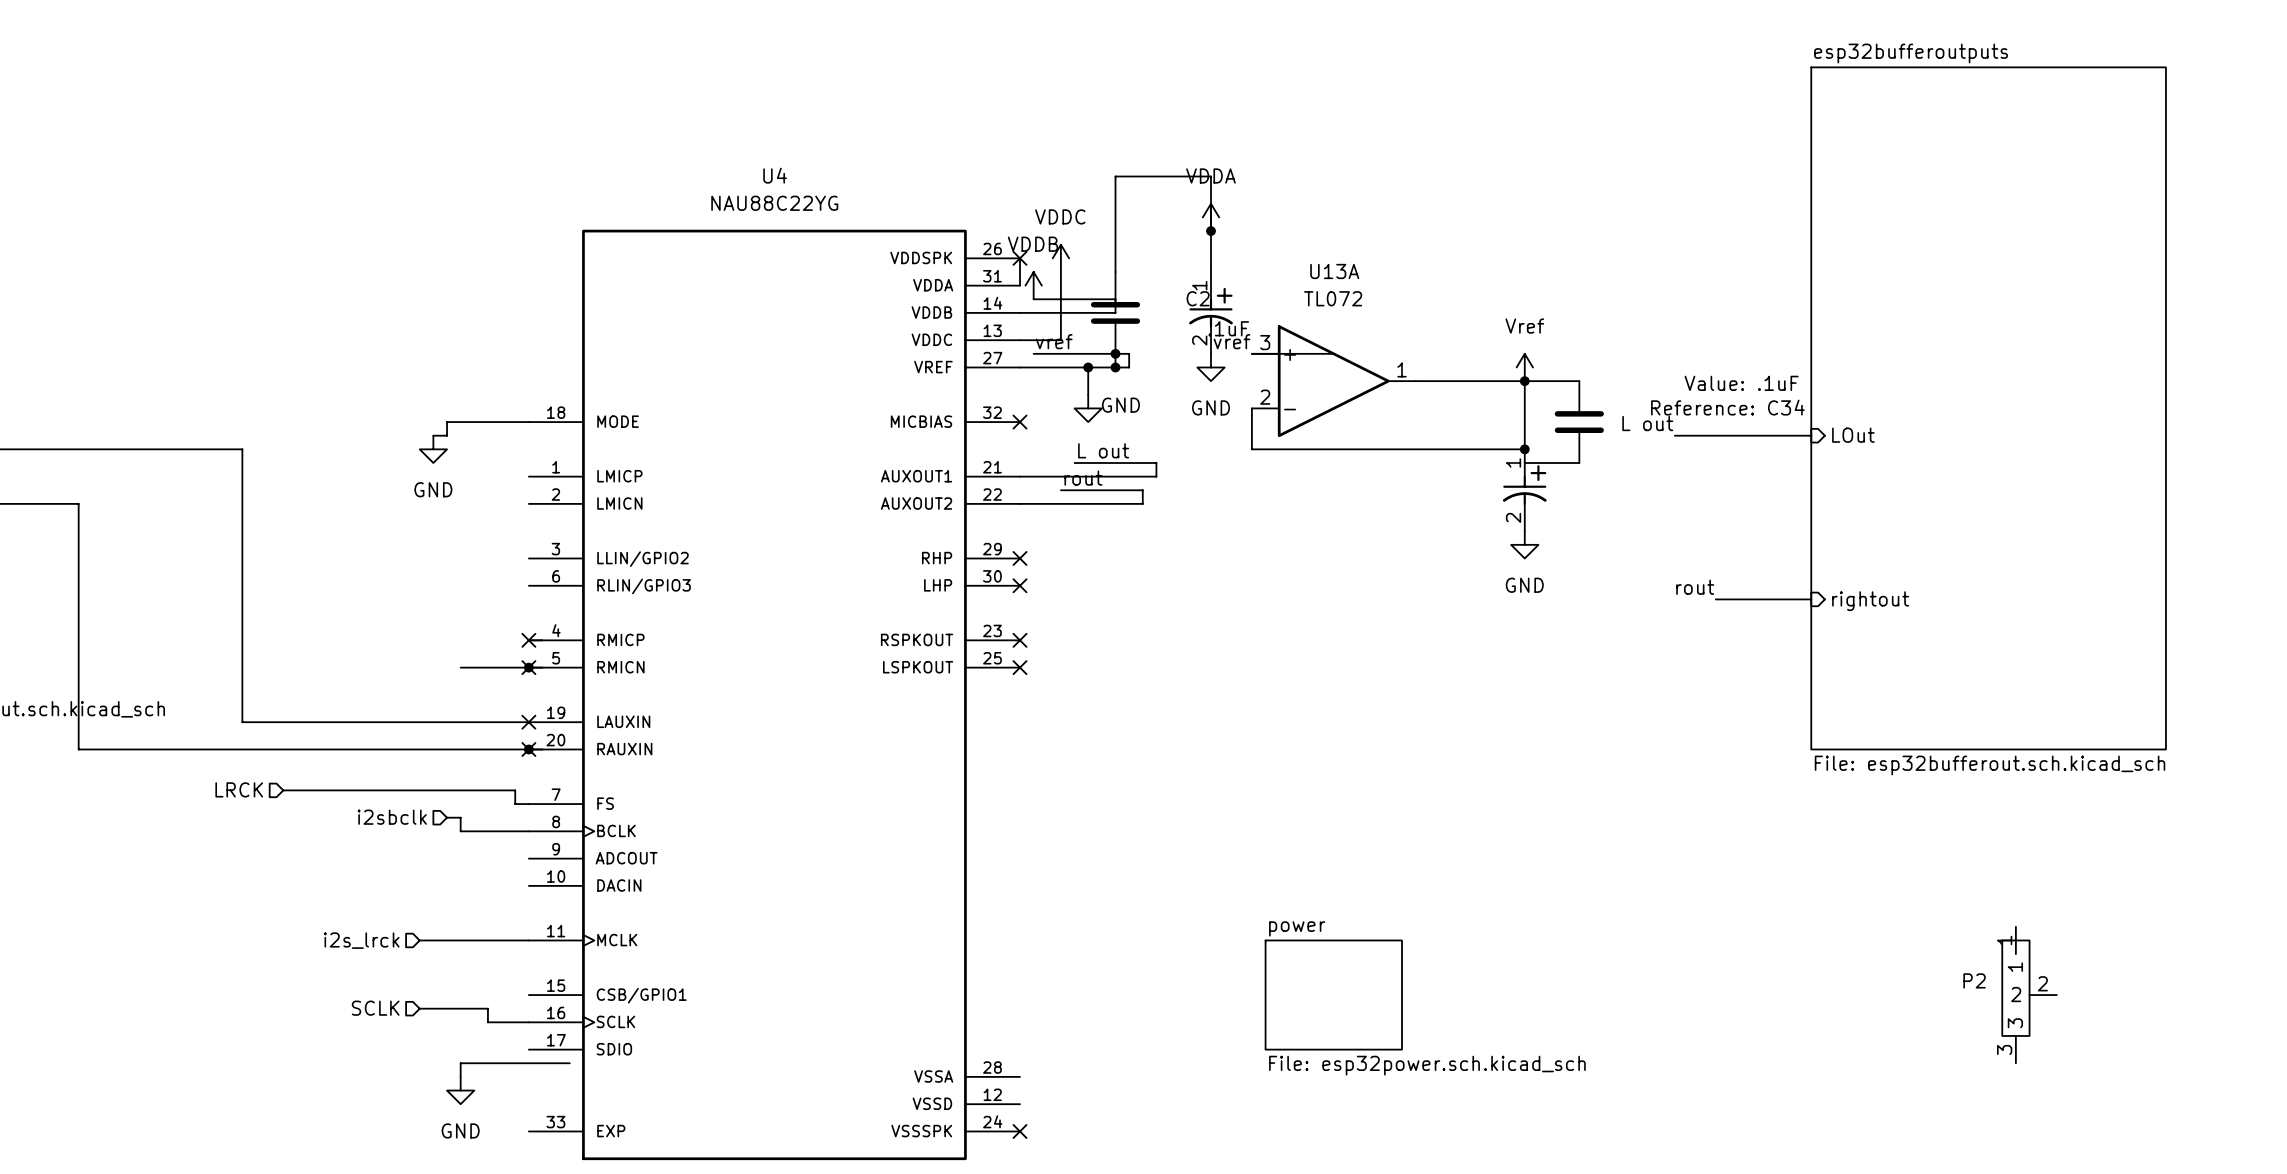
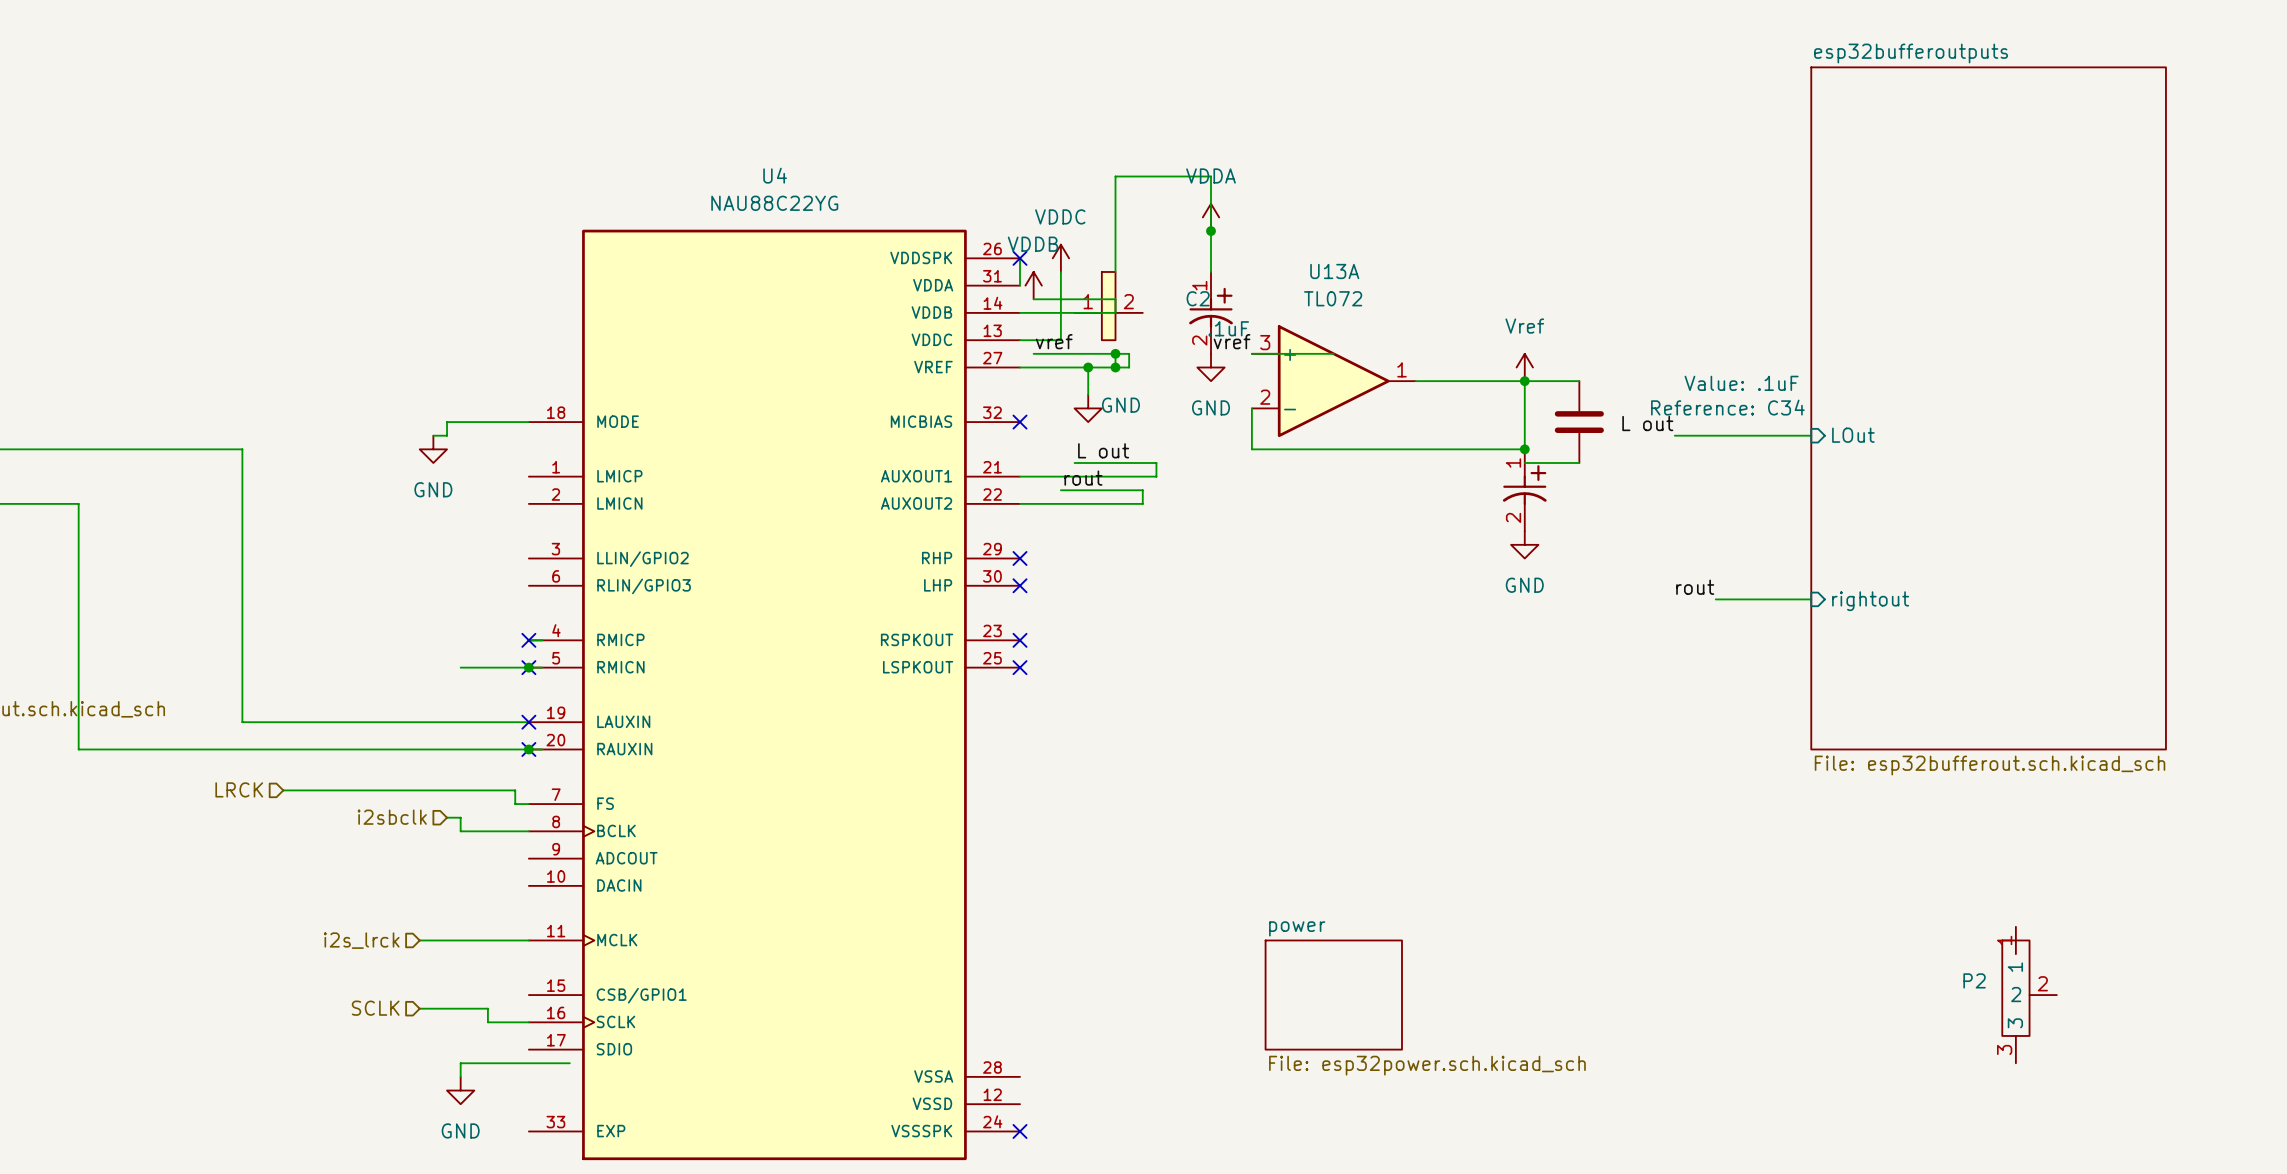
C2 symbol: [1090, 271, 1141, 354] -> [1074, 271, 1143, 341]

